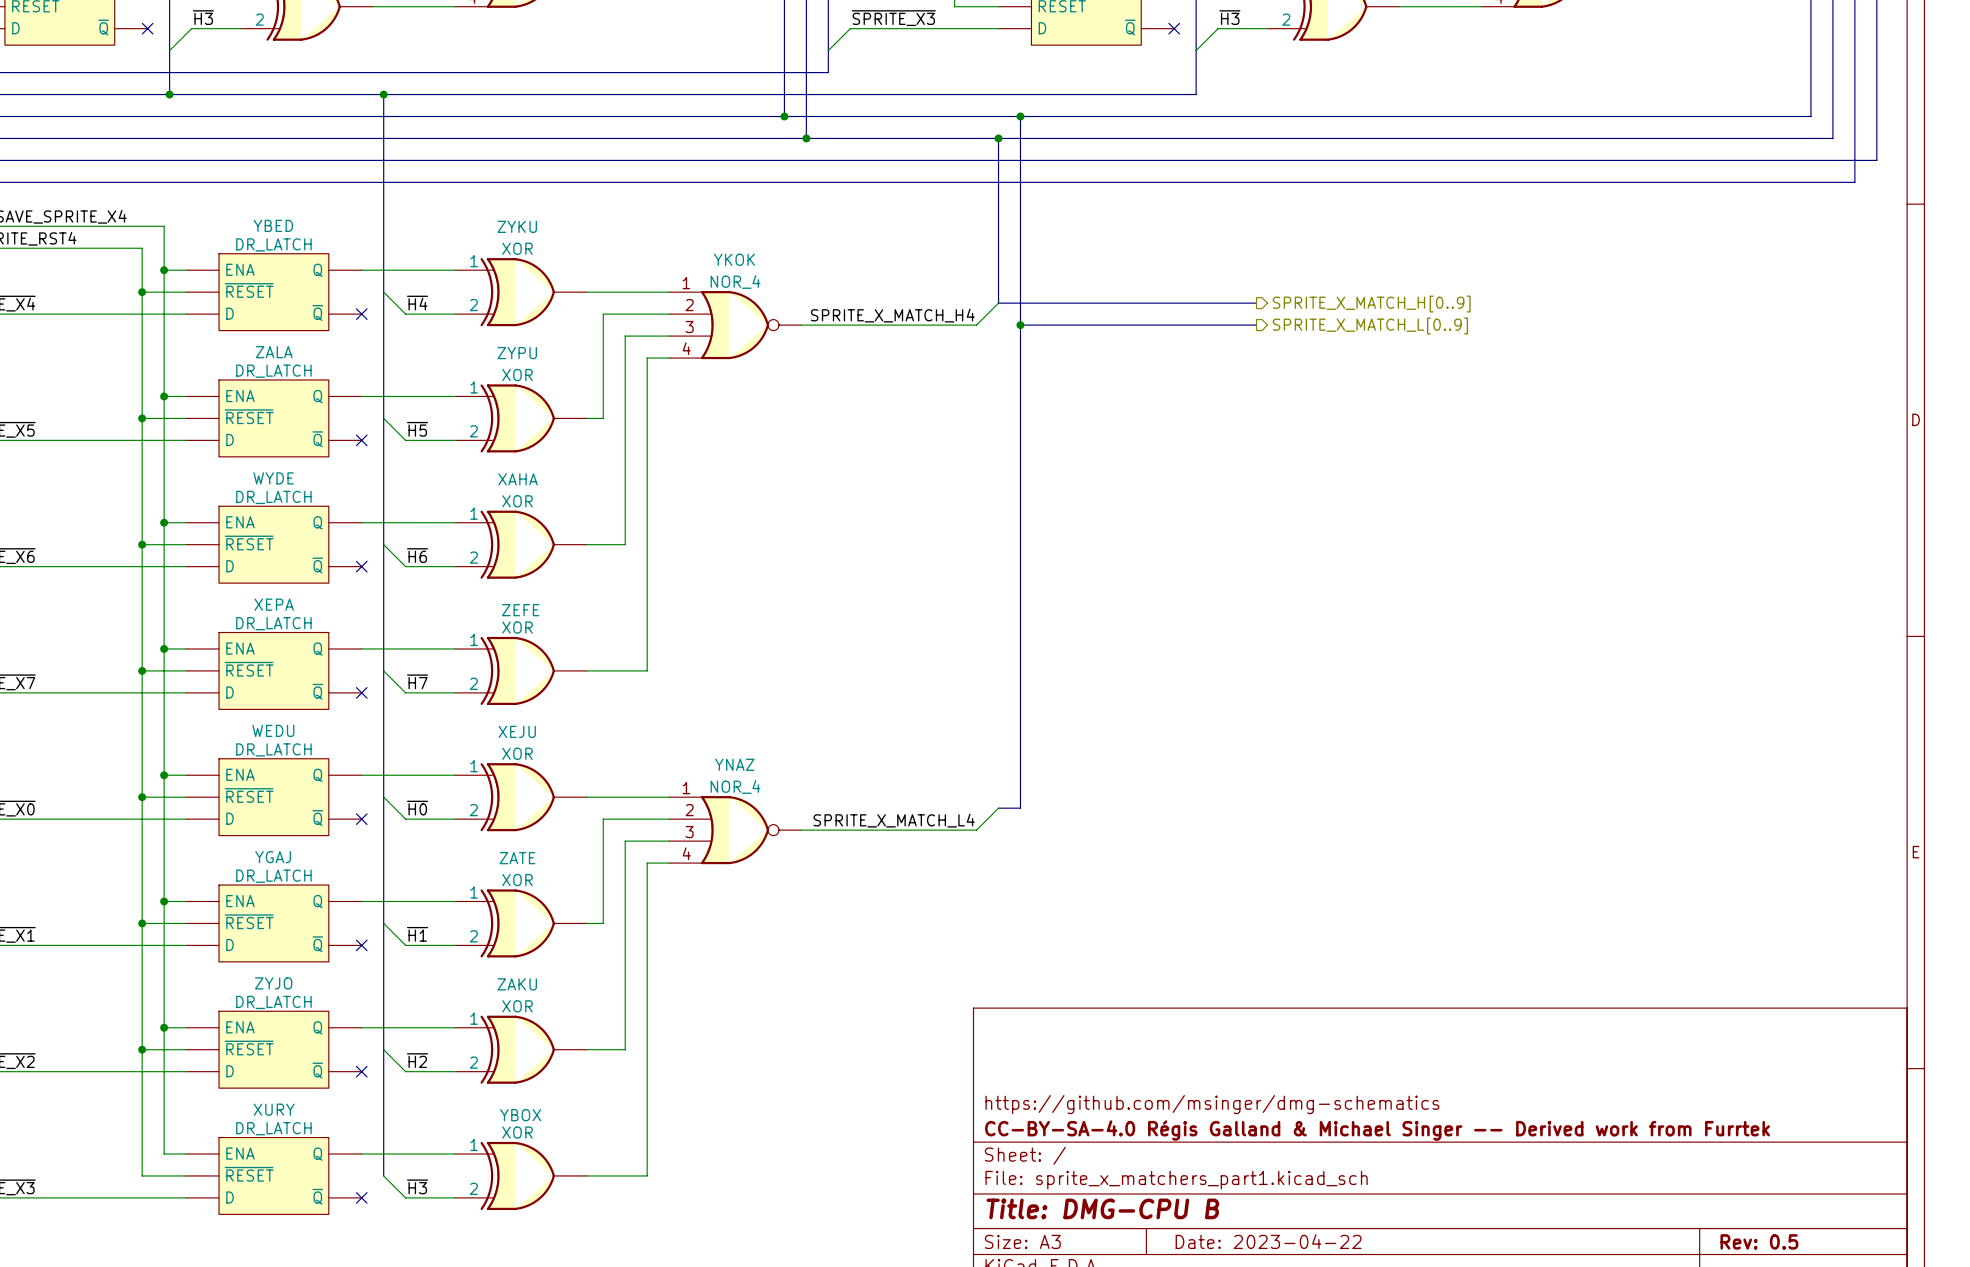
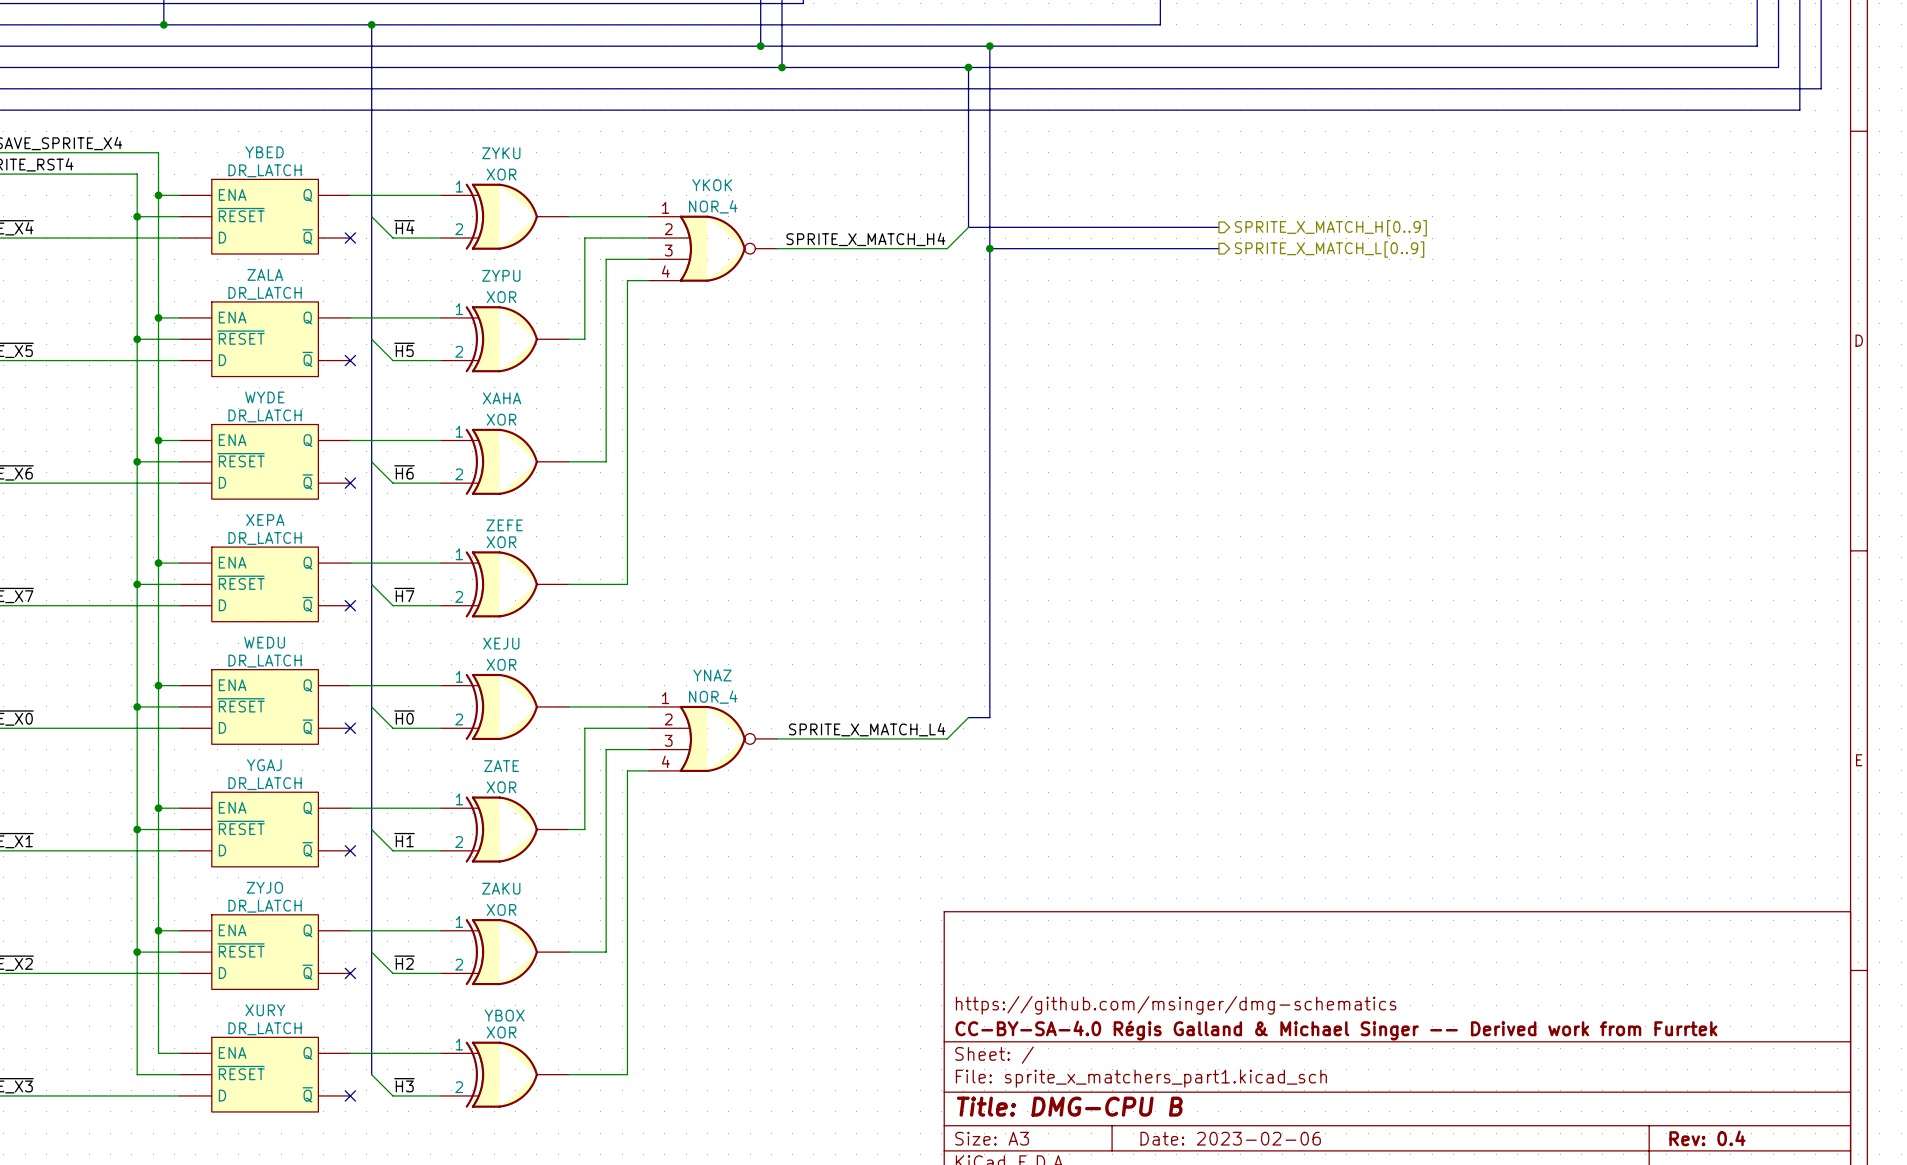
title block: Date: 2023-04-22 (1268, 1241) -> Date: 2023-02-06 (1230, 1138)
title block: Rev: 0.5 (1759, 1241) -> Rev: 0.4 (1707, 1138)

